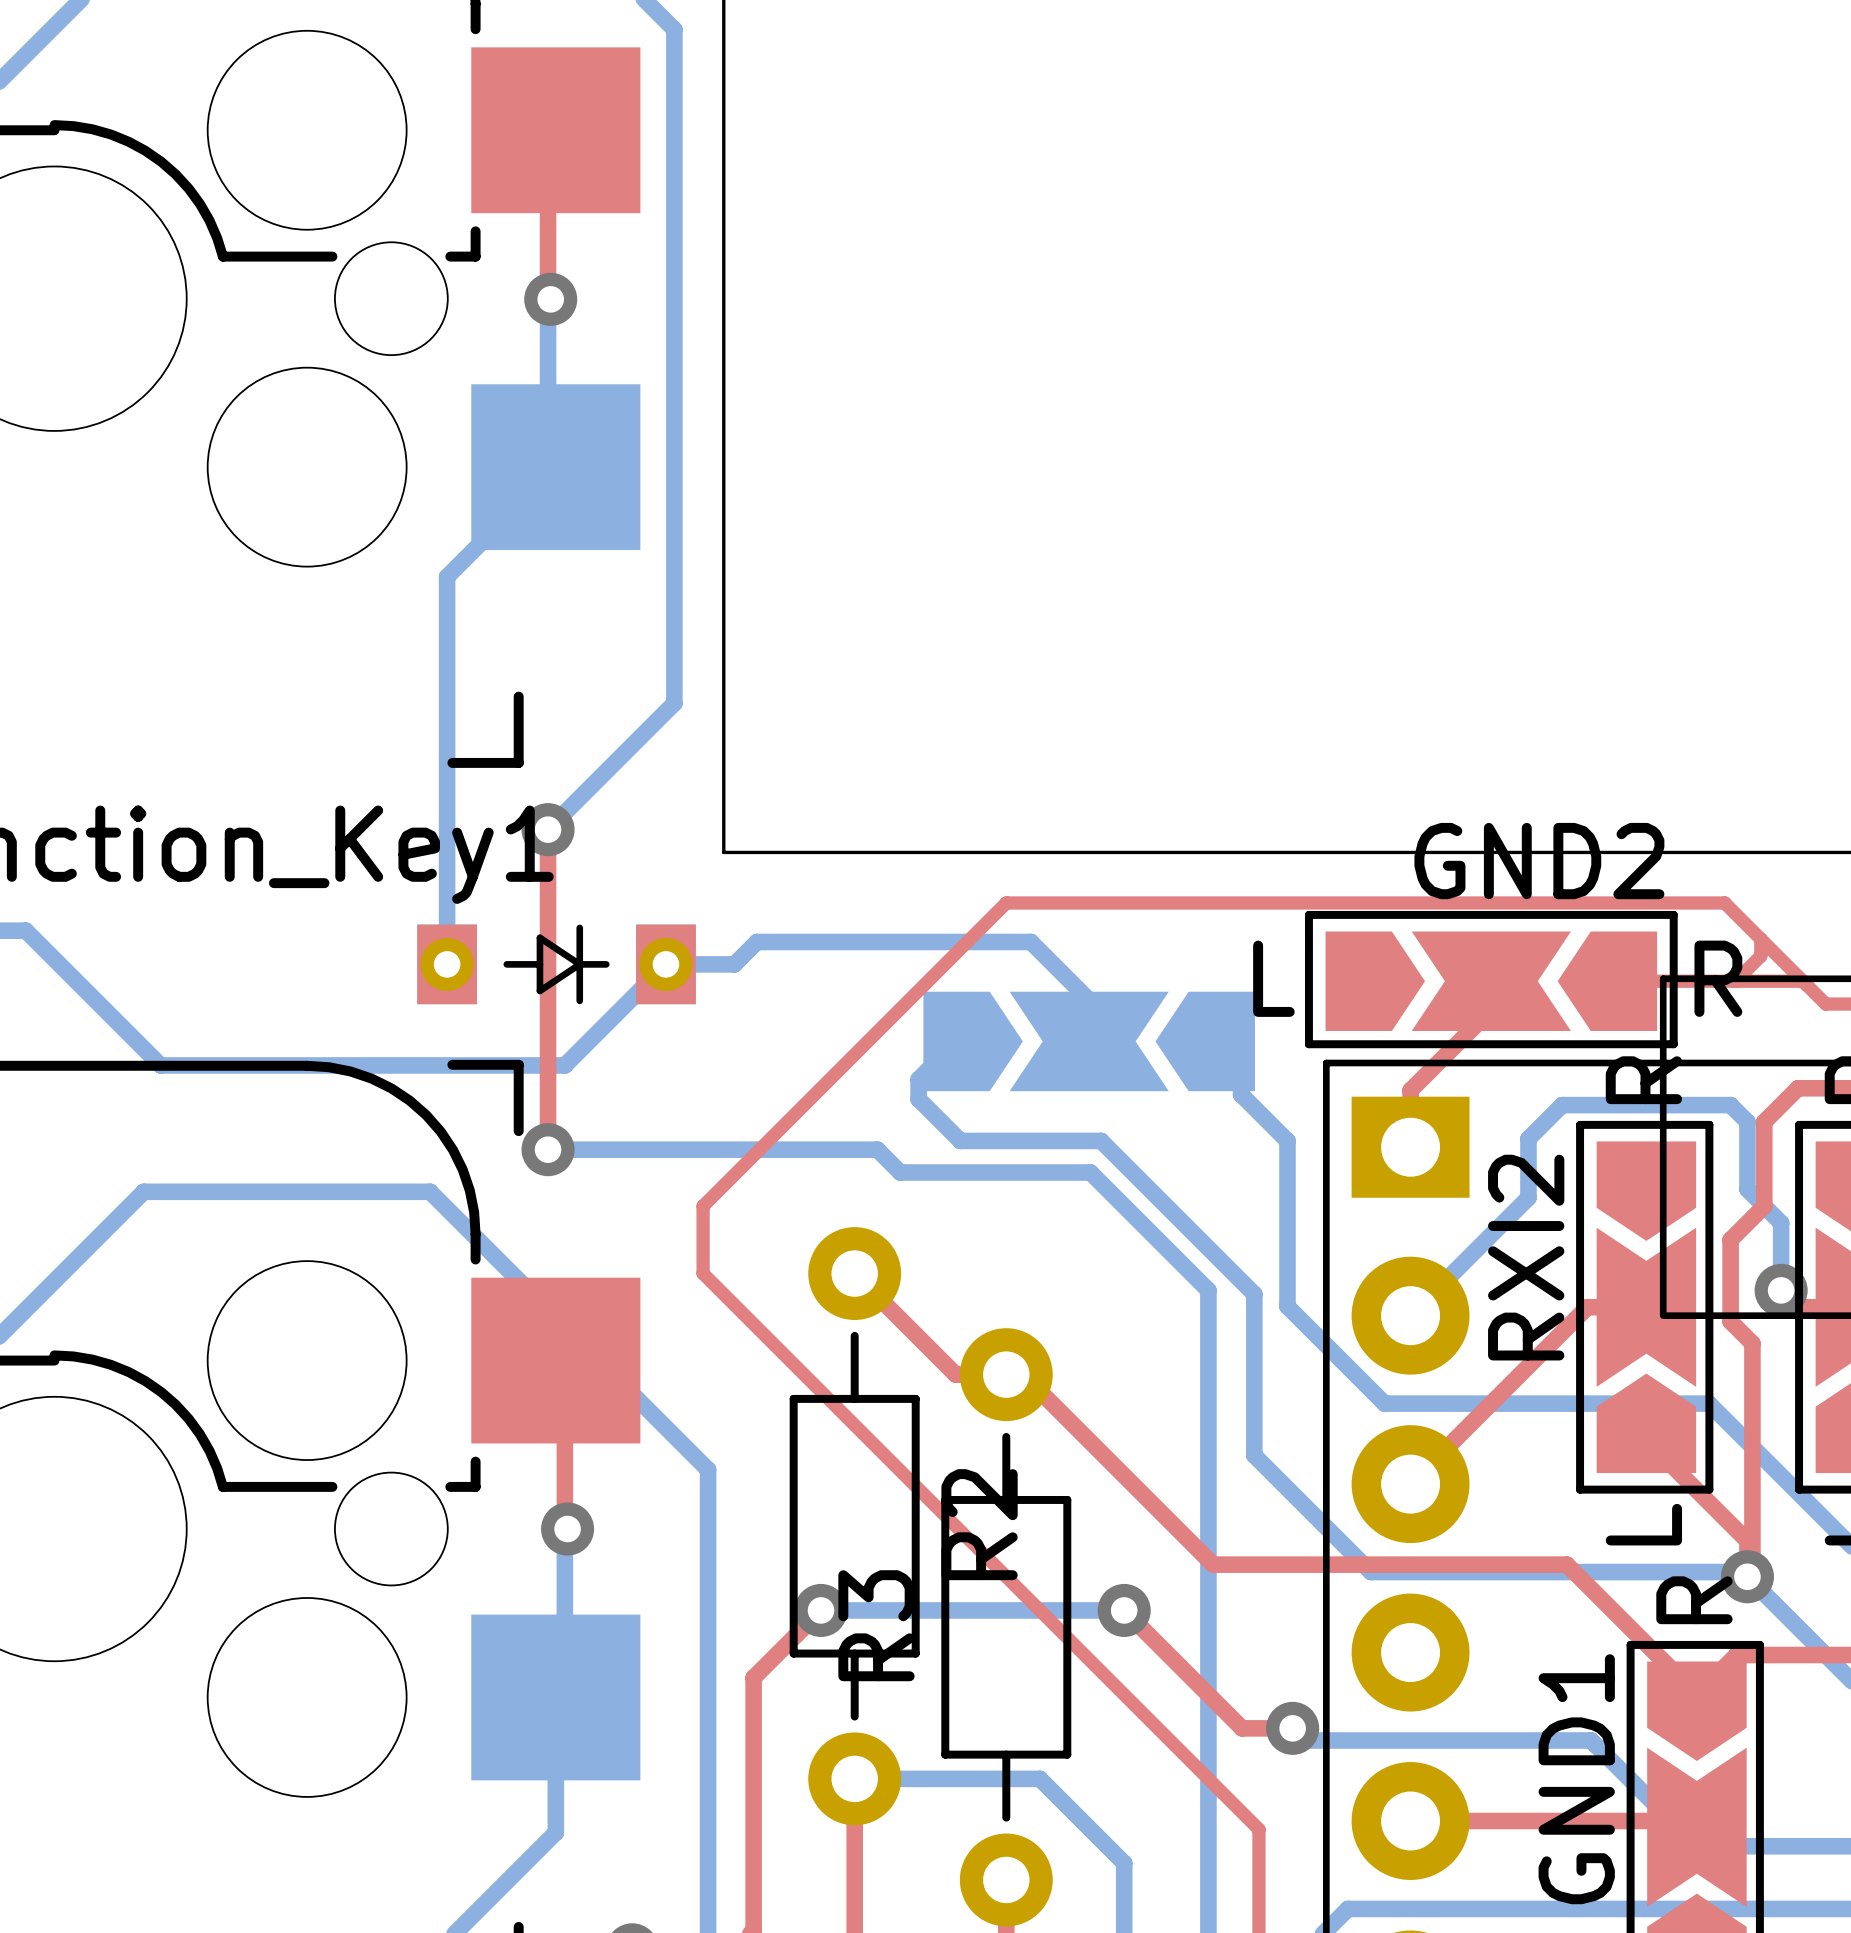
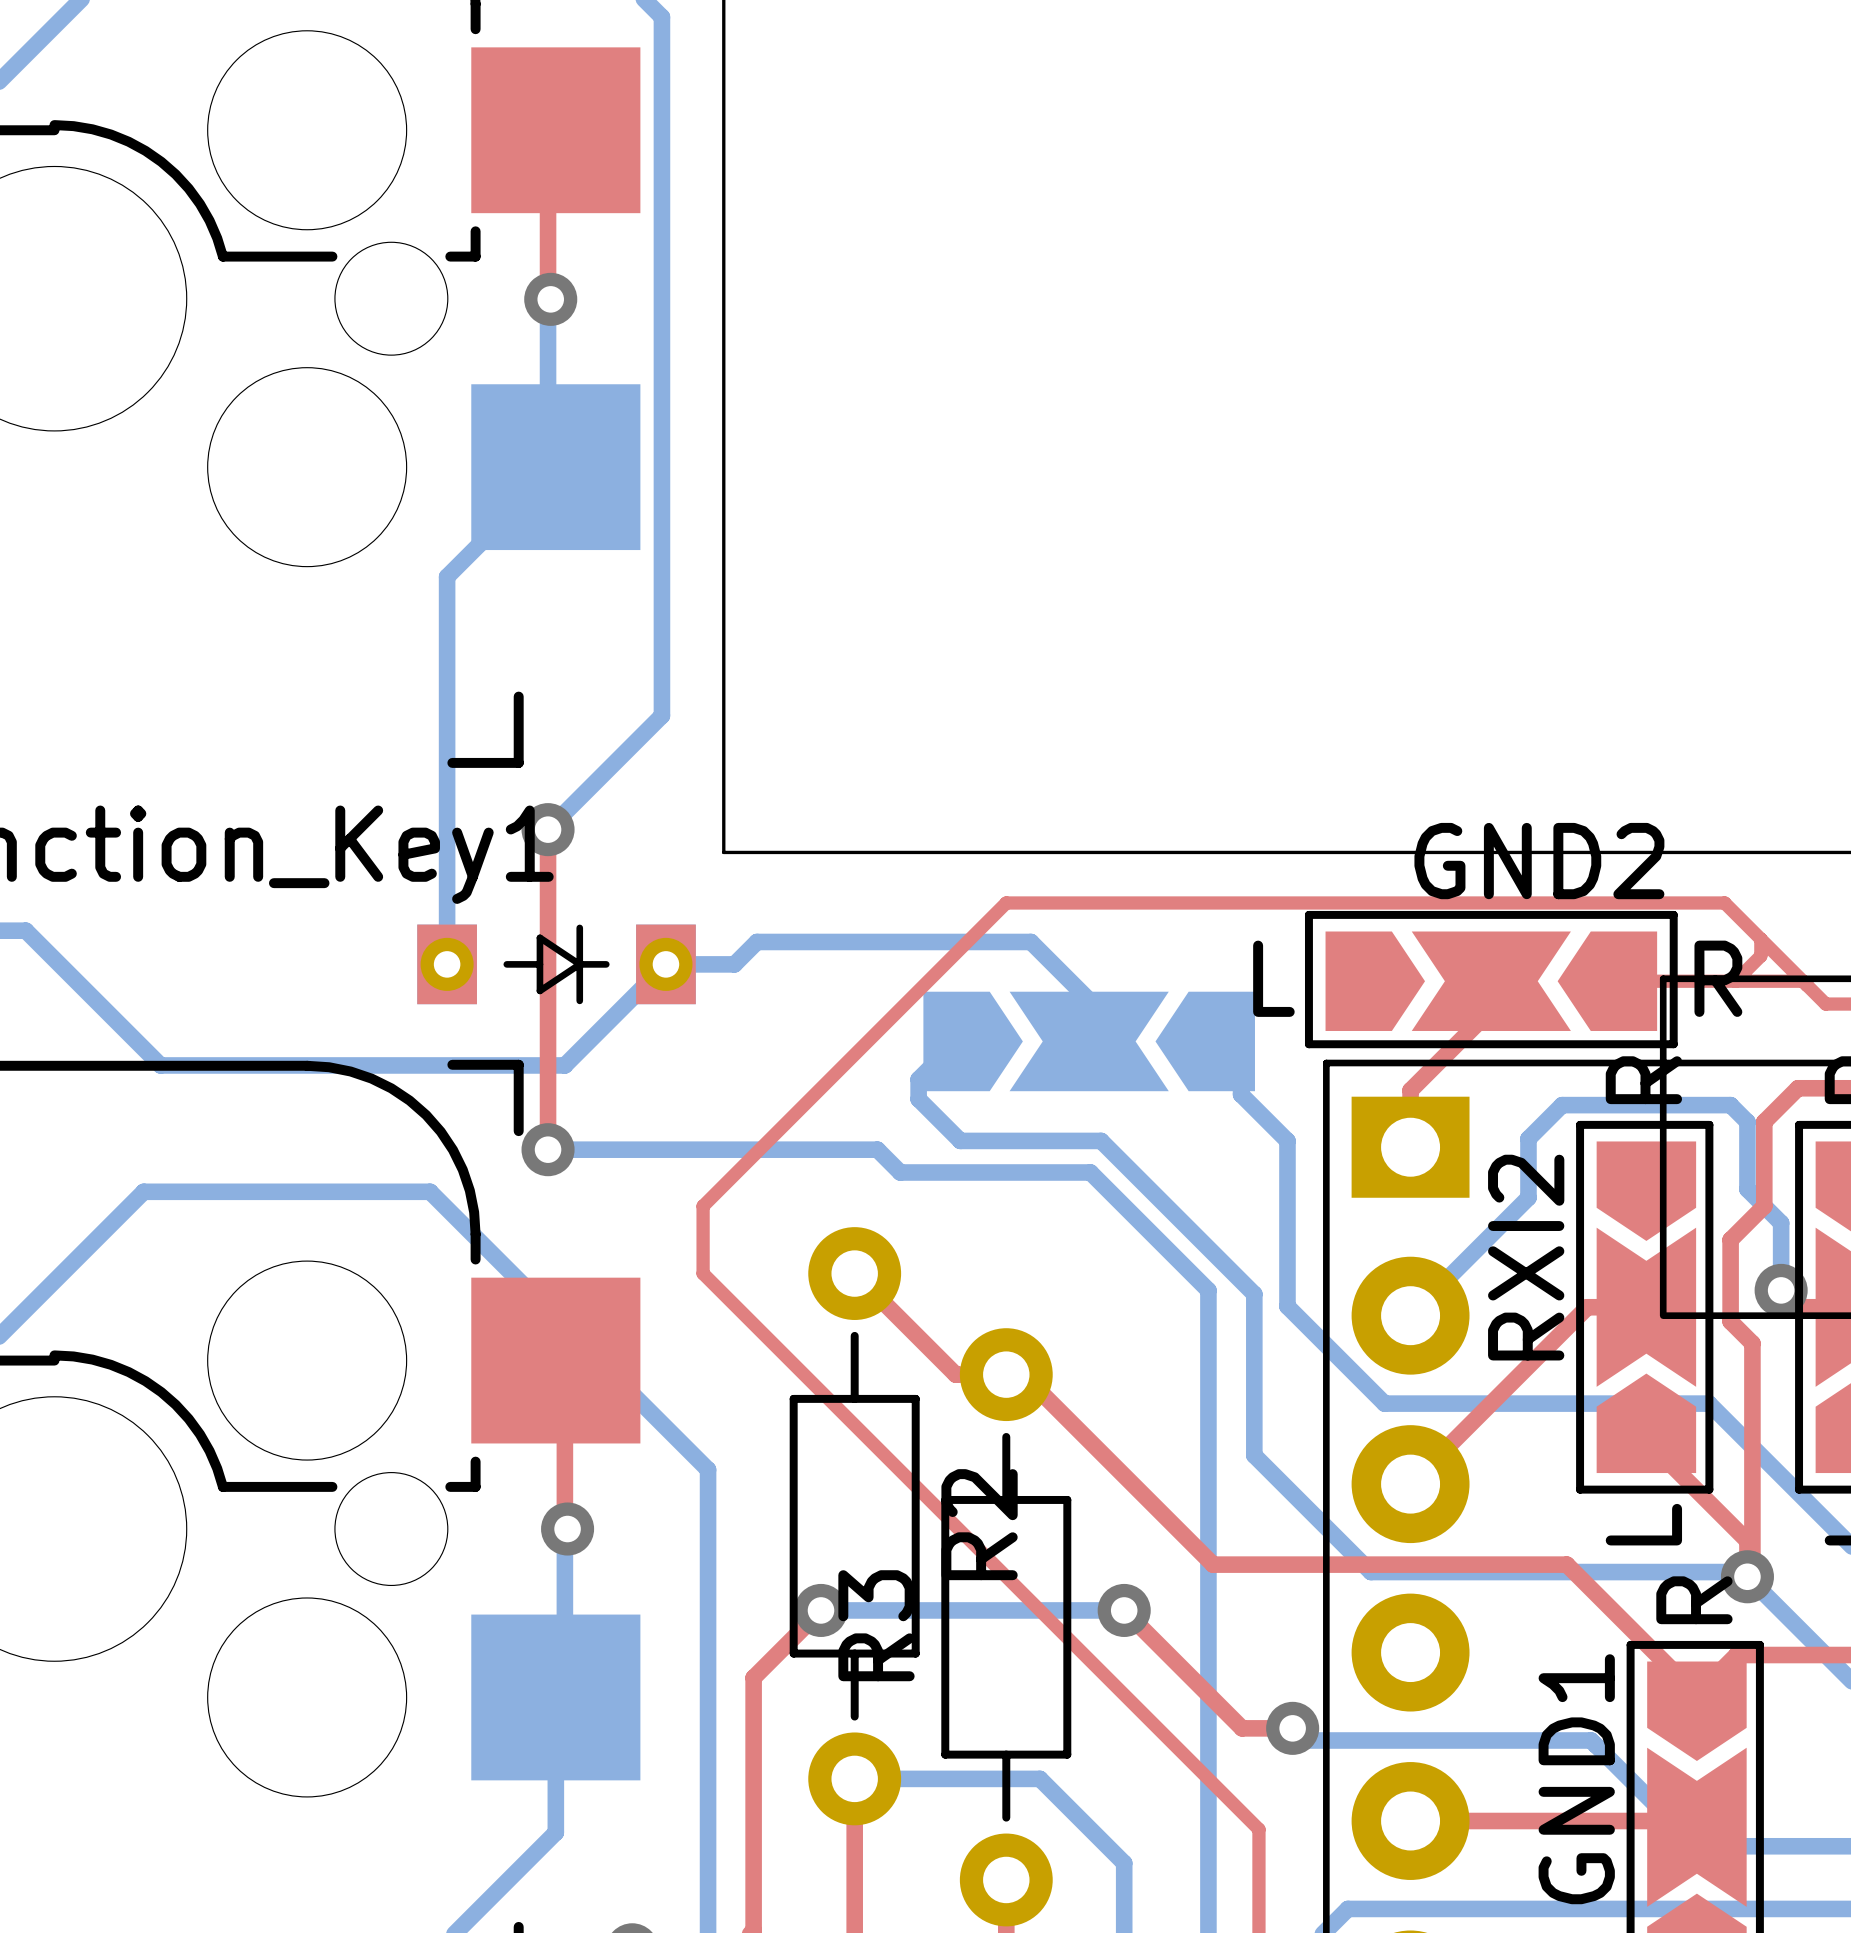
bottom track: (661, 17) (674, 29) (674, 703) (661, 715) -> (661, 17) (661, 715)

